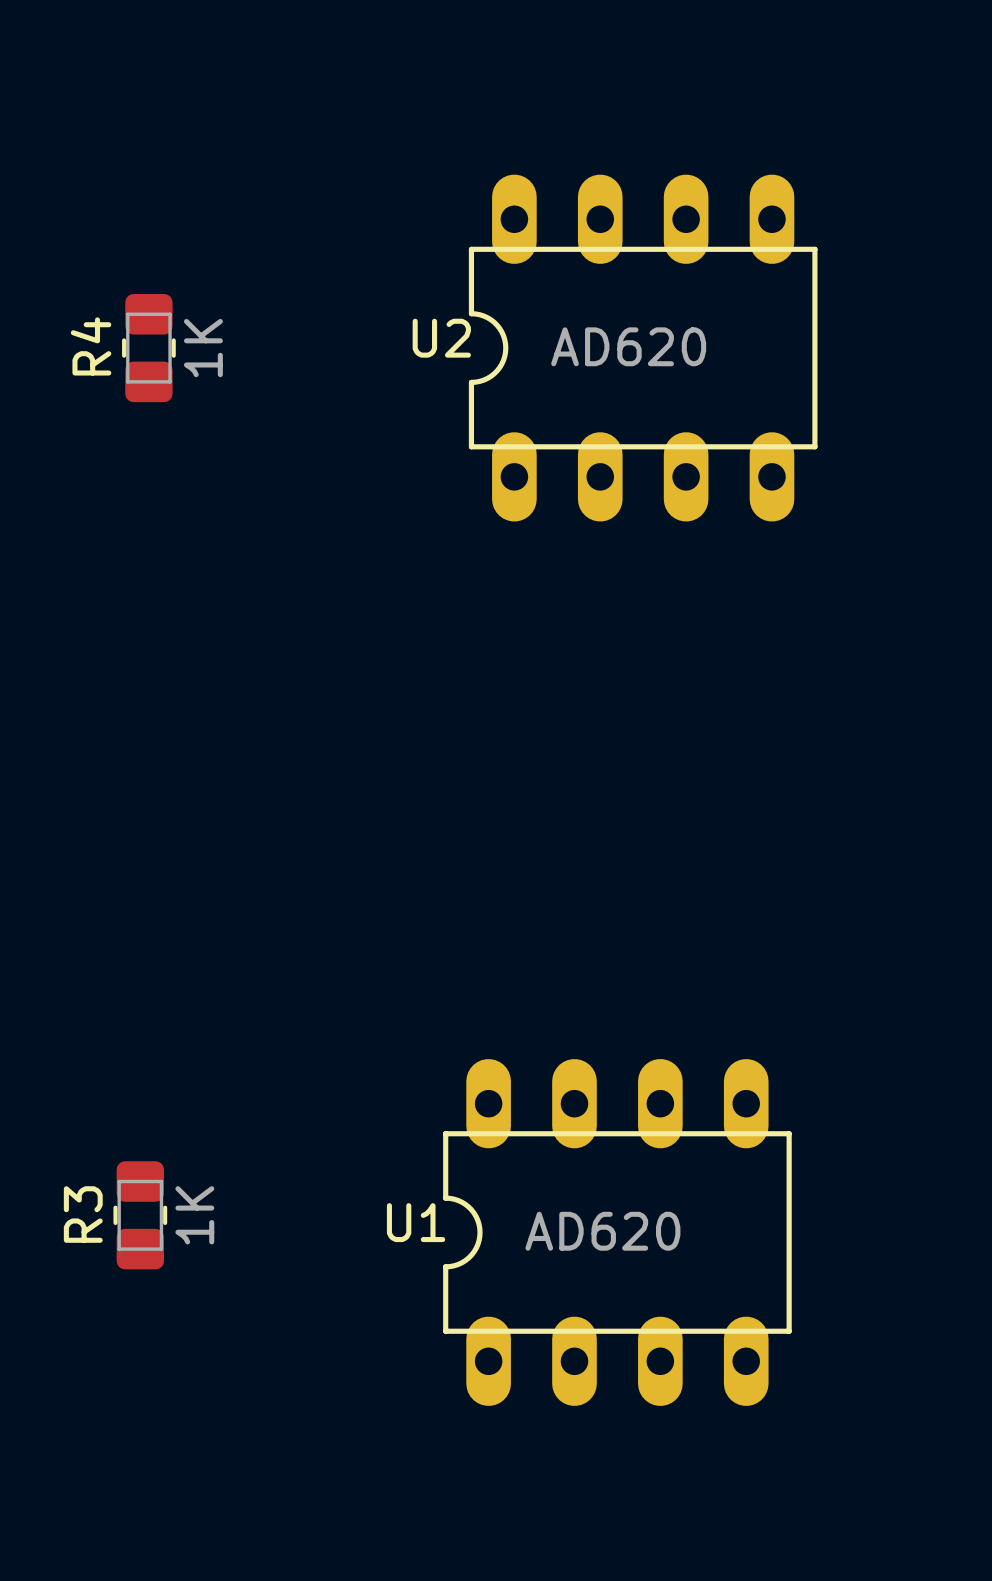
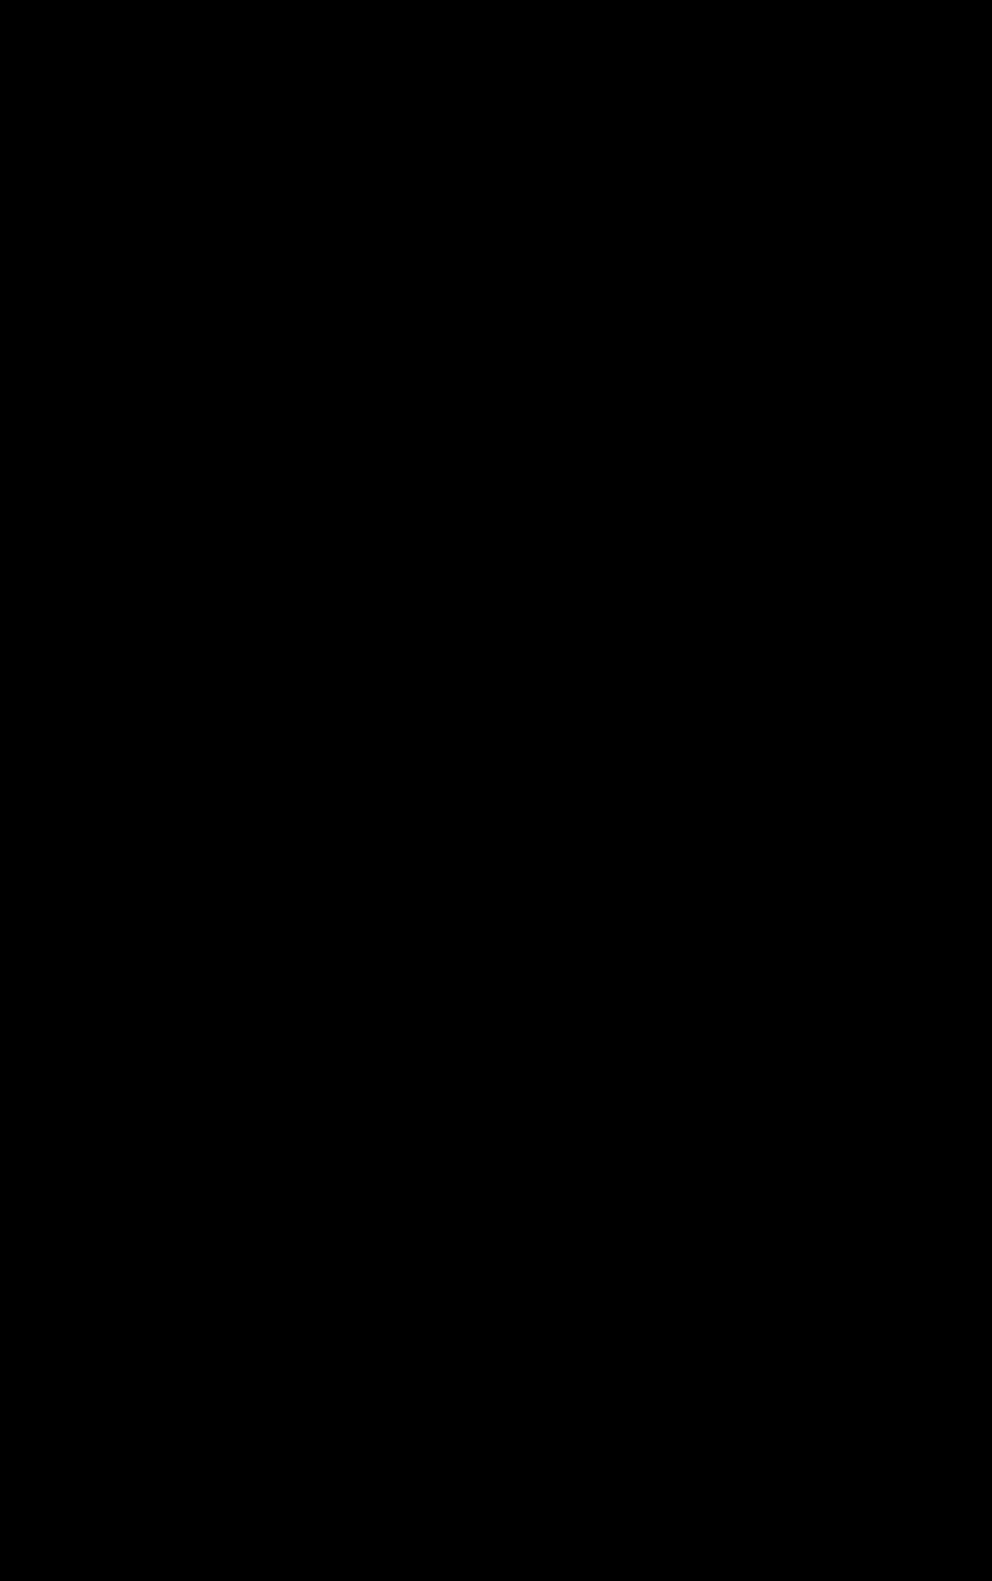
R4: 1K (148, 348) -> none
U2: AD620 (643, 348) -> none
R3: 1K (140, 1215) -> none
U1: AD620 (617, 1232) -> none

